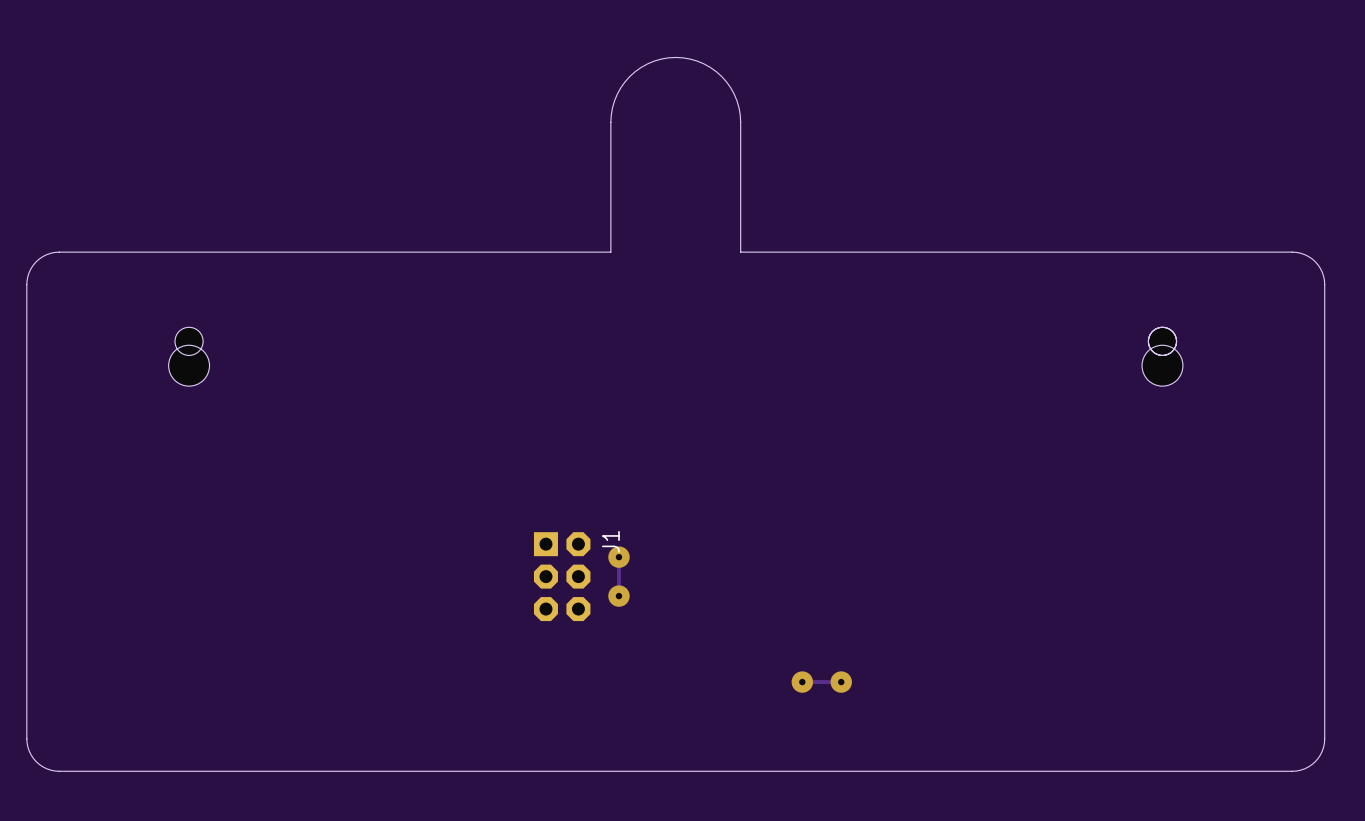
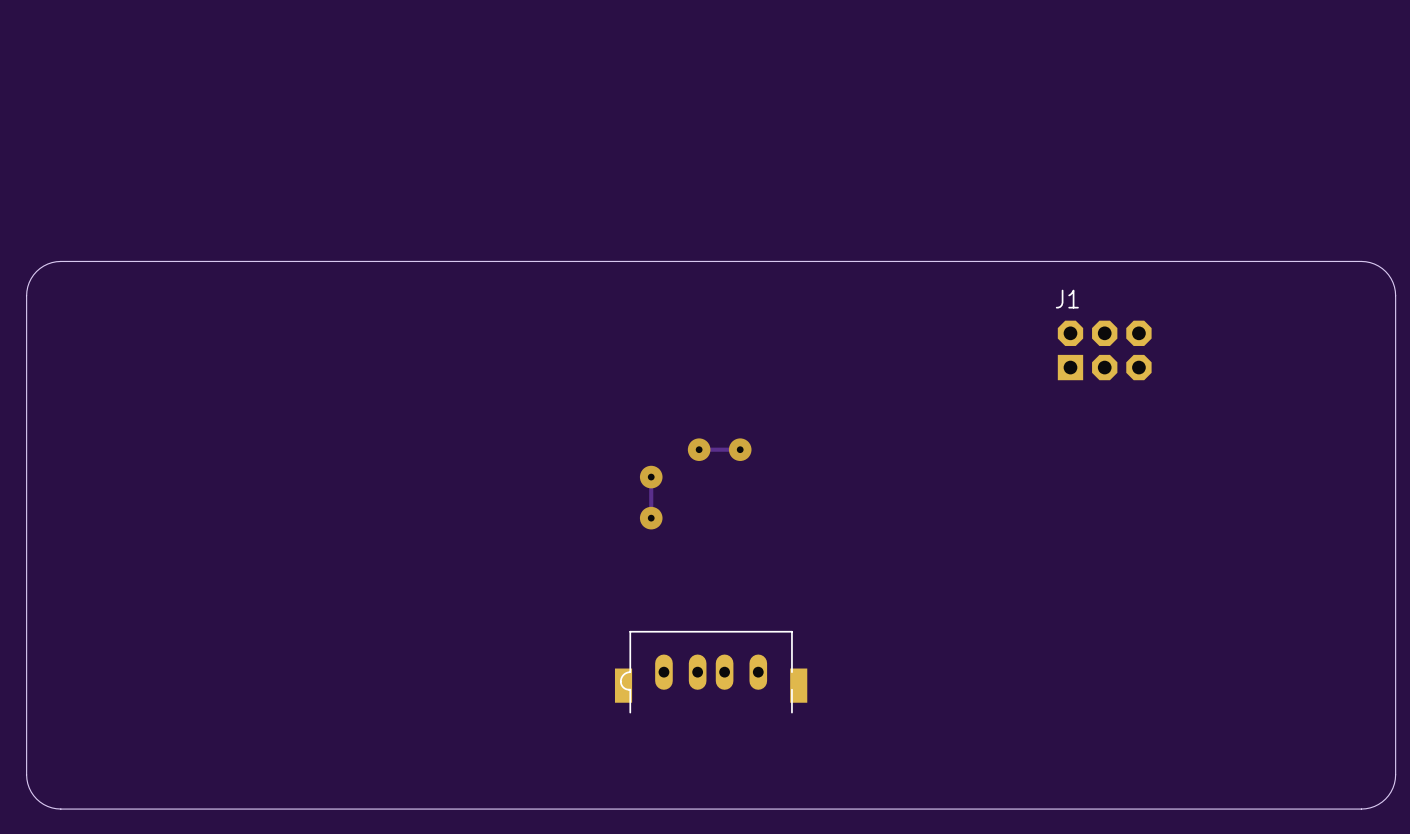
board edge: (740, 252) (740, 122) (737, 100) (726, 81) (710, 67) (690, 59) (675, 57) (661, 59) (641, 67) (625, 81) (614, 100) (610, 122) (610, 252) -> (779, 261) (642, 261)
hole: (189, 341) -> none
hole: (1162, 341) -> none
hole: (189, 365) -> none
hole: (1162, 365) -> none
via: none -> (699, 449)
via: none -> (740, 449)
via: none -> (651, 477)
via: none -> (651, 518)
track: (618, 557) (618, 596) -> (651, 477) (651, 518)
via: (618, 557) -> none
J1 rotation: 0° (562, 576) -> 90° counterclockwise (1104, 350)
J1 position: (562, 576) -> (1104, 350)
via: (618, 596) -> none
part: none -> (711, 672)
via: (802, 682) -> none
track: (841, 682) (802, 682) -> (740, 449) (699, 449)
via: (841, 682) -> none

